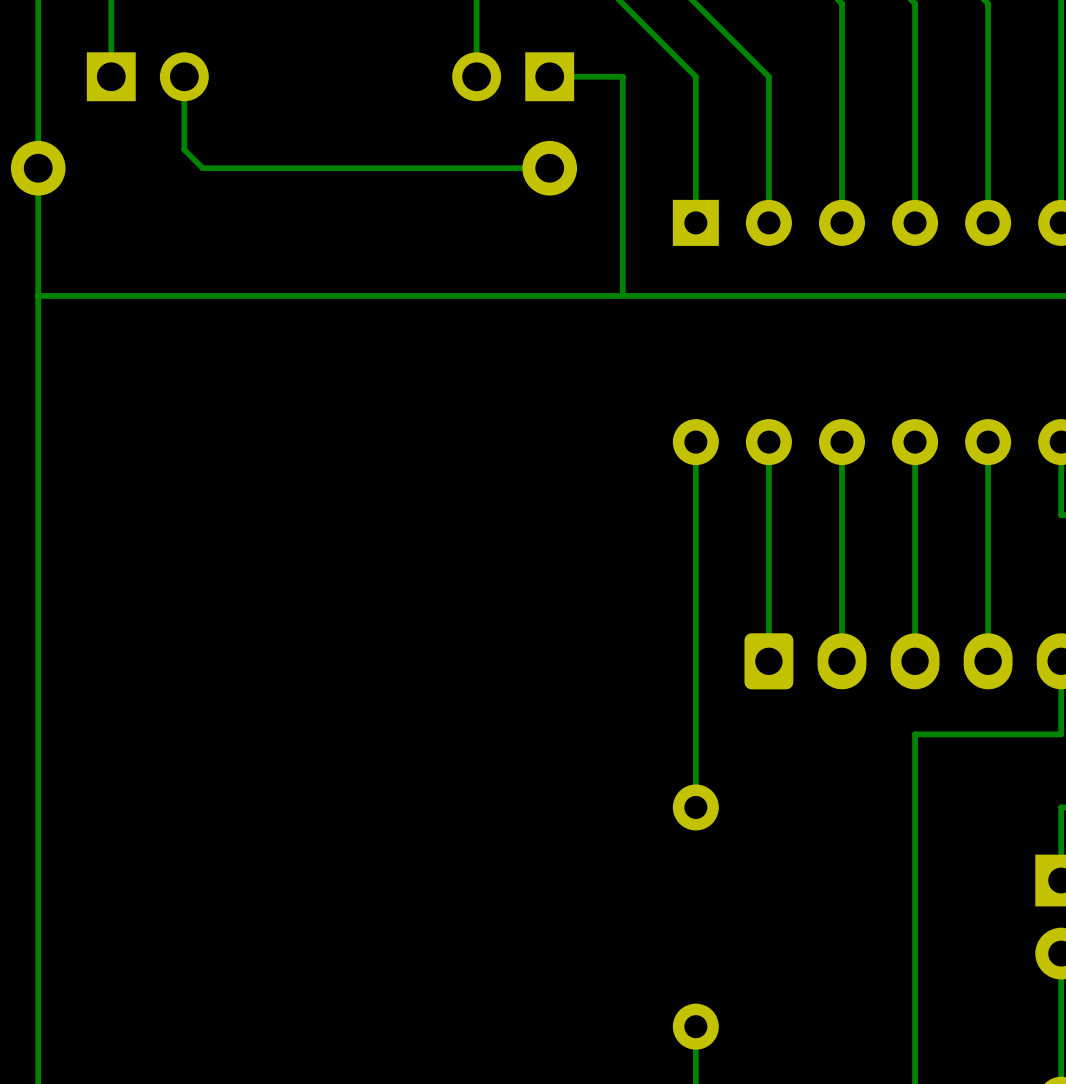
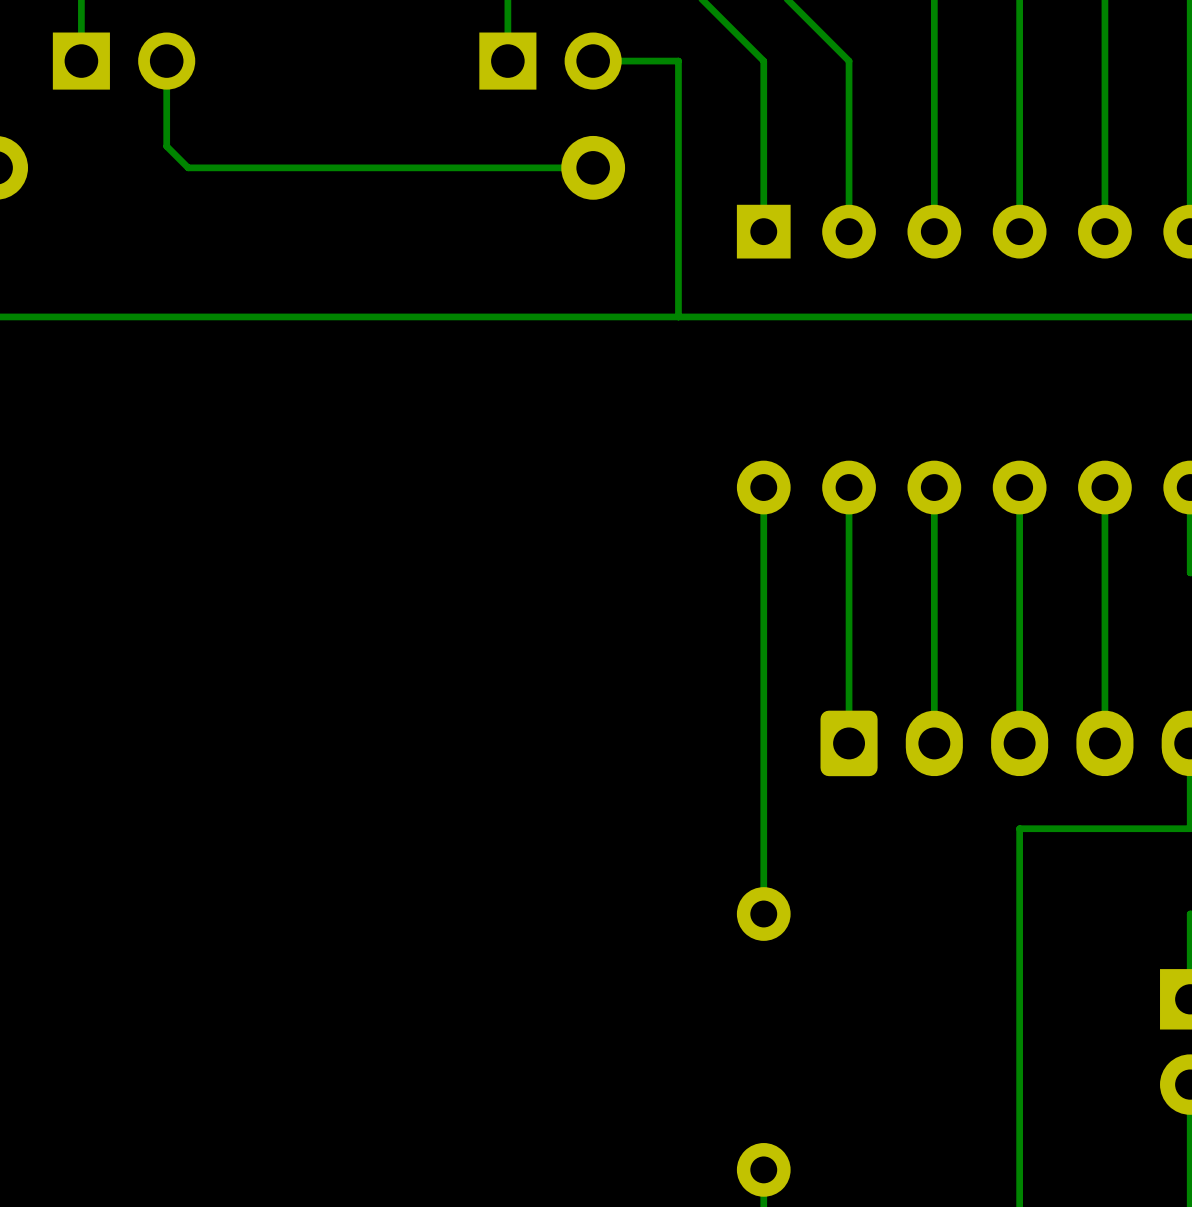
part rotation: 0° (513, 76) -> 180° (550, 61)

